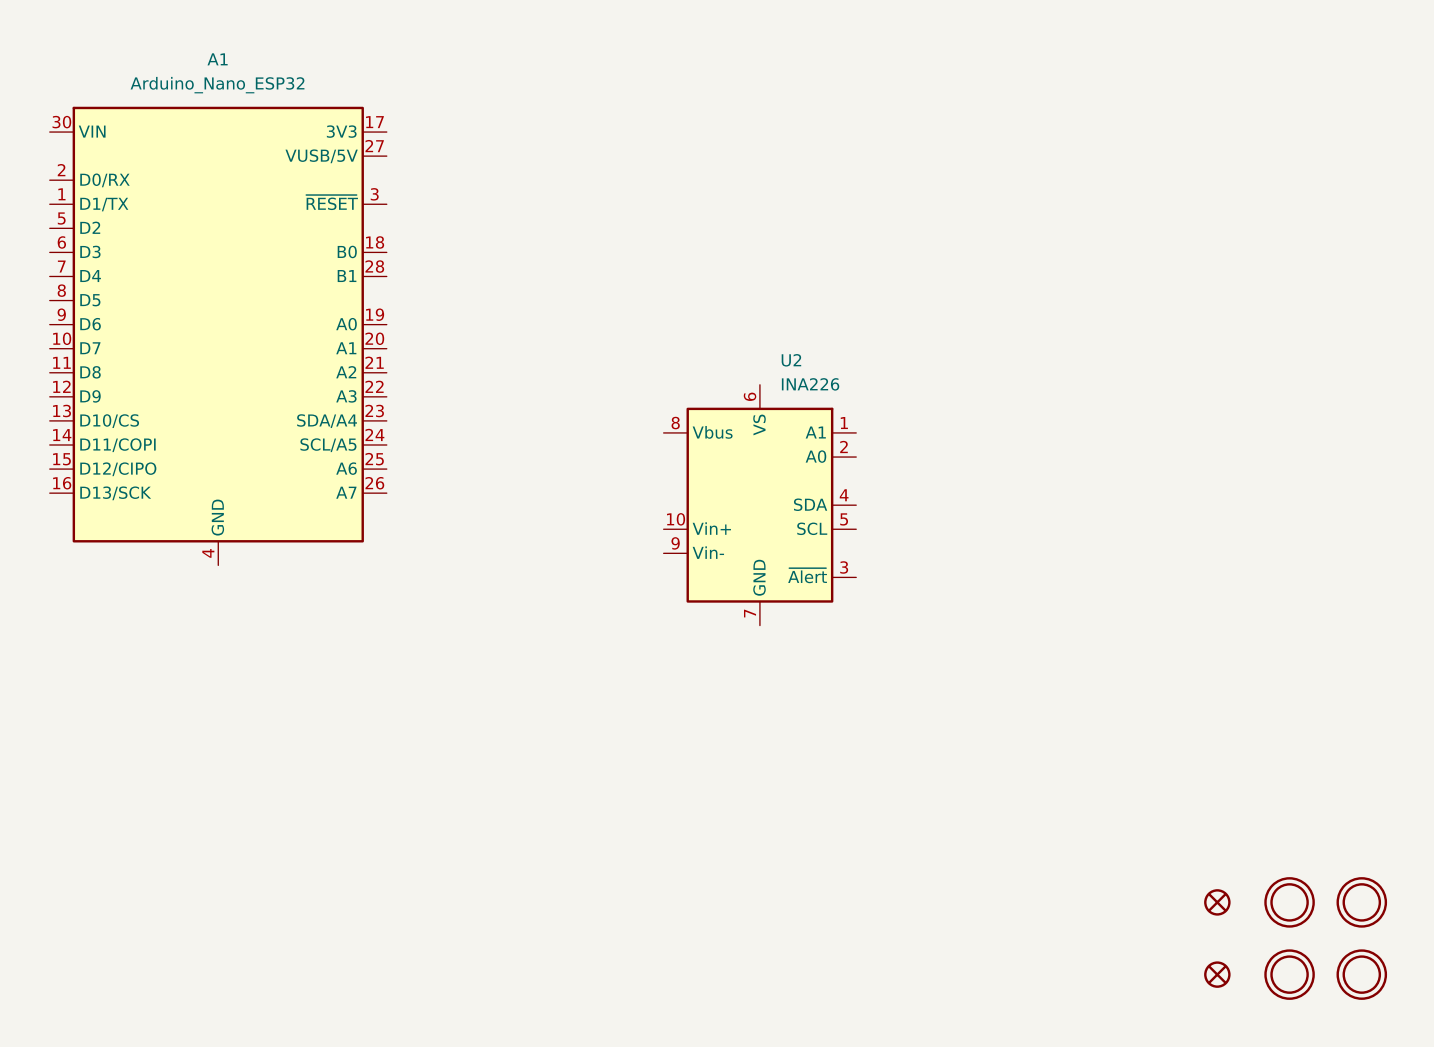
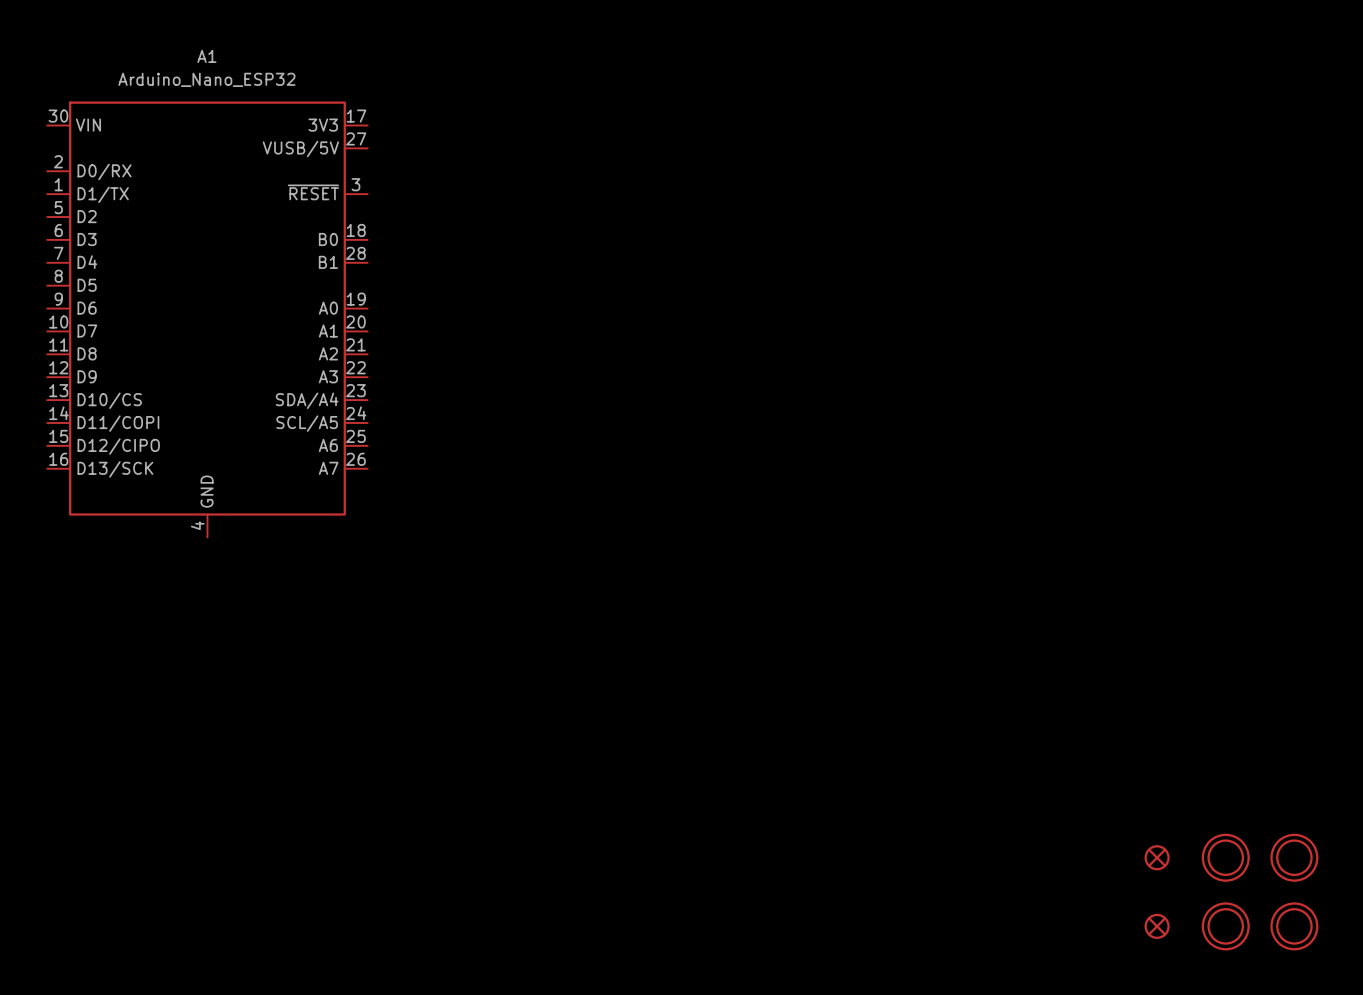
U2: INA226 (759, 505) -> none

